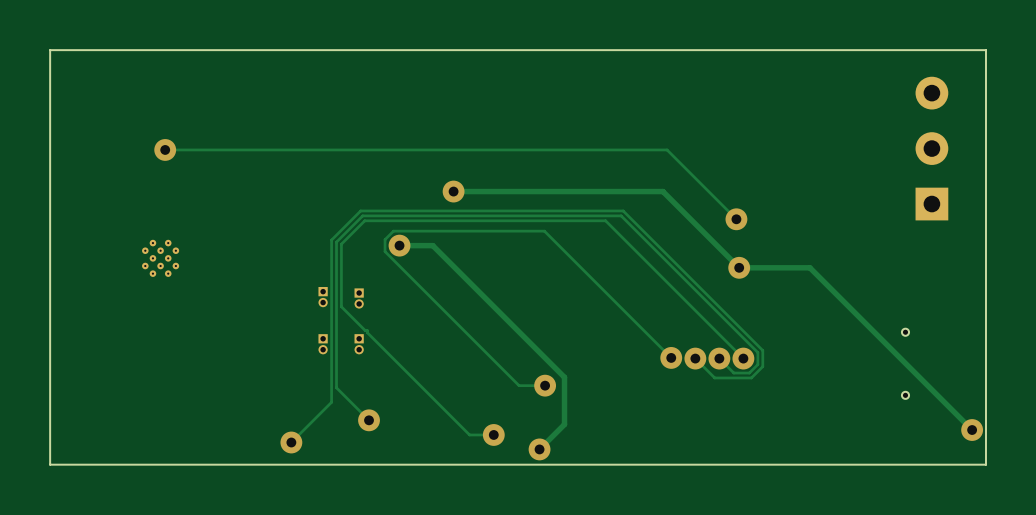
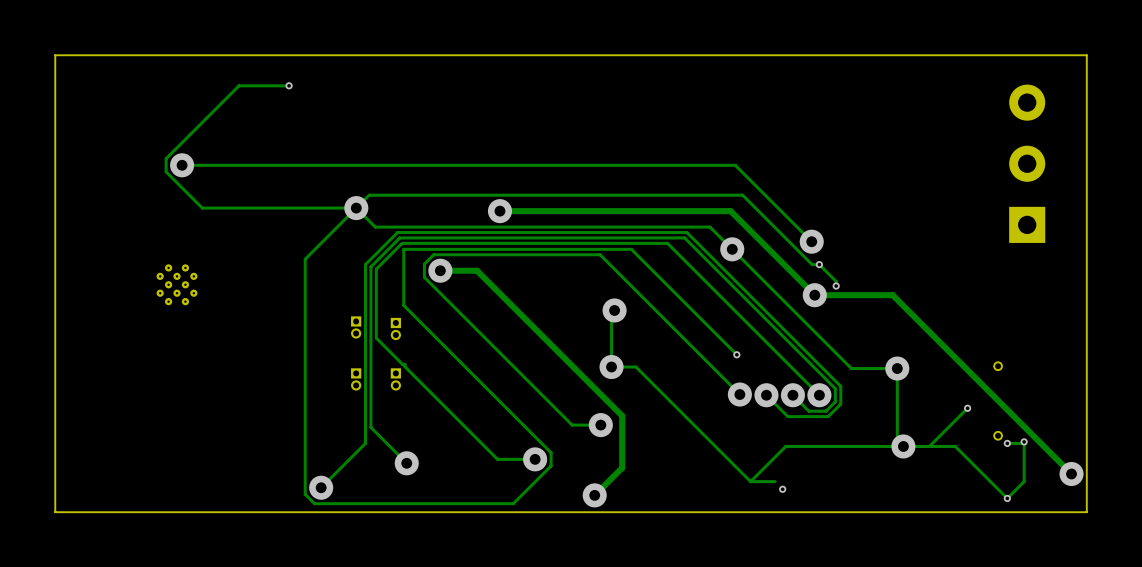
track: none -> (289, 85) (239, 85) (166, 158) (166, 171) (202, 208) (356, 208) (375, 227) (710, 227) (851, 368) (897, 368) (897, 440) (903, 446)
via: none -> (289, 85)
via: none -> (356, 208)
via: none -> (732, 249)
via: none -> (819, 264)
track: none -> (836, 286) (836, 281) (819, 264) (812, 264) (742, 195) (369, 195) (305, 259) (305, 494) (314, 503) (513, 503) (551, 465) (551, 452) (403, 305) (403, 249) (631, 249) (736, 354)
via: none -> (836, 286)
track: none -> (614, 310) (611, 313) (611, 367) (635, 367) (750, 481)
via: none -> (614, 310)
via: none -> (736, 354)
via: none -> (611, 367)
via: none -> (897, 368)
track: none -> (967, 408) (929, 446)
via: none -> (967, 408)
via: none -> (1024, 441)
track: none -> (1007, 443) (1024, 441) (1024, 481) (1007, 498) (955, 446) (785, 446) (750, 481)
via: none -> (1007, 443)
via: none -> (903, 446)
track: (451, 416) (469, 434) (493, 434) -> (497, 459) (535, 459)
via position: (493, 434) -> (535, 459)
track: none -> (775, 481) (750, 481)
via: none -> (782, 489)
via: none -> (1007, 498)

